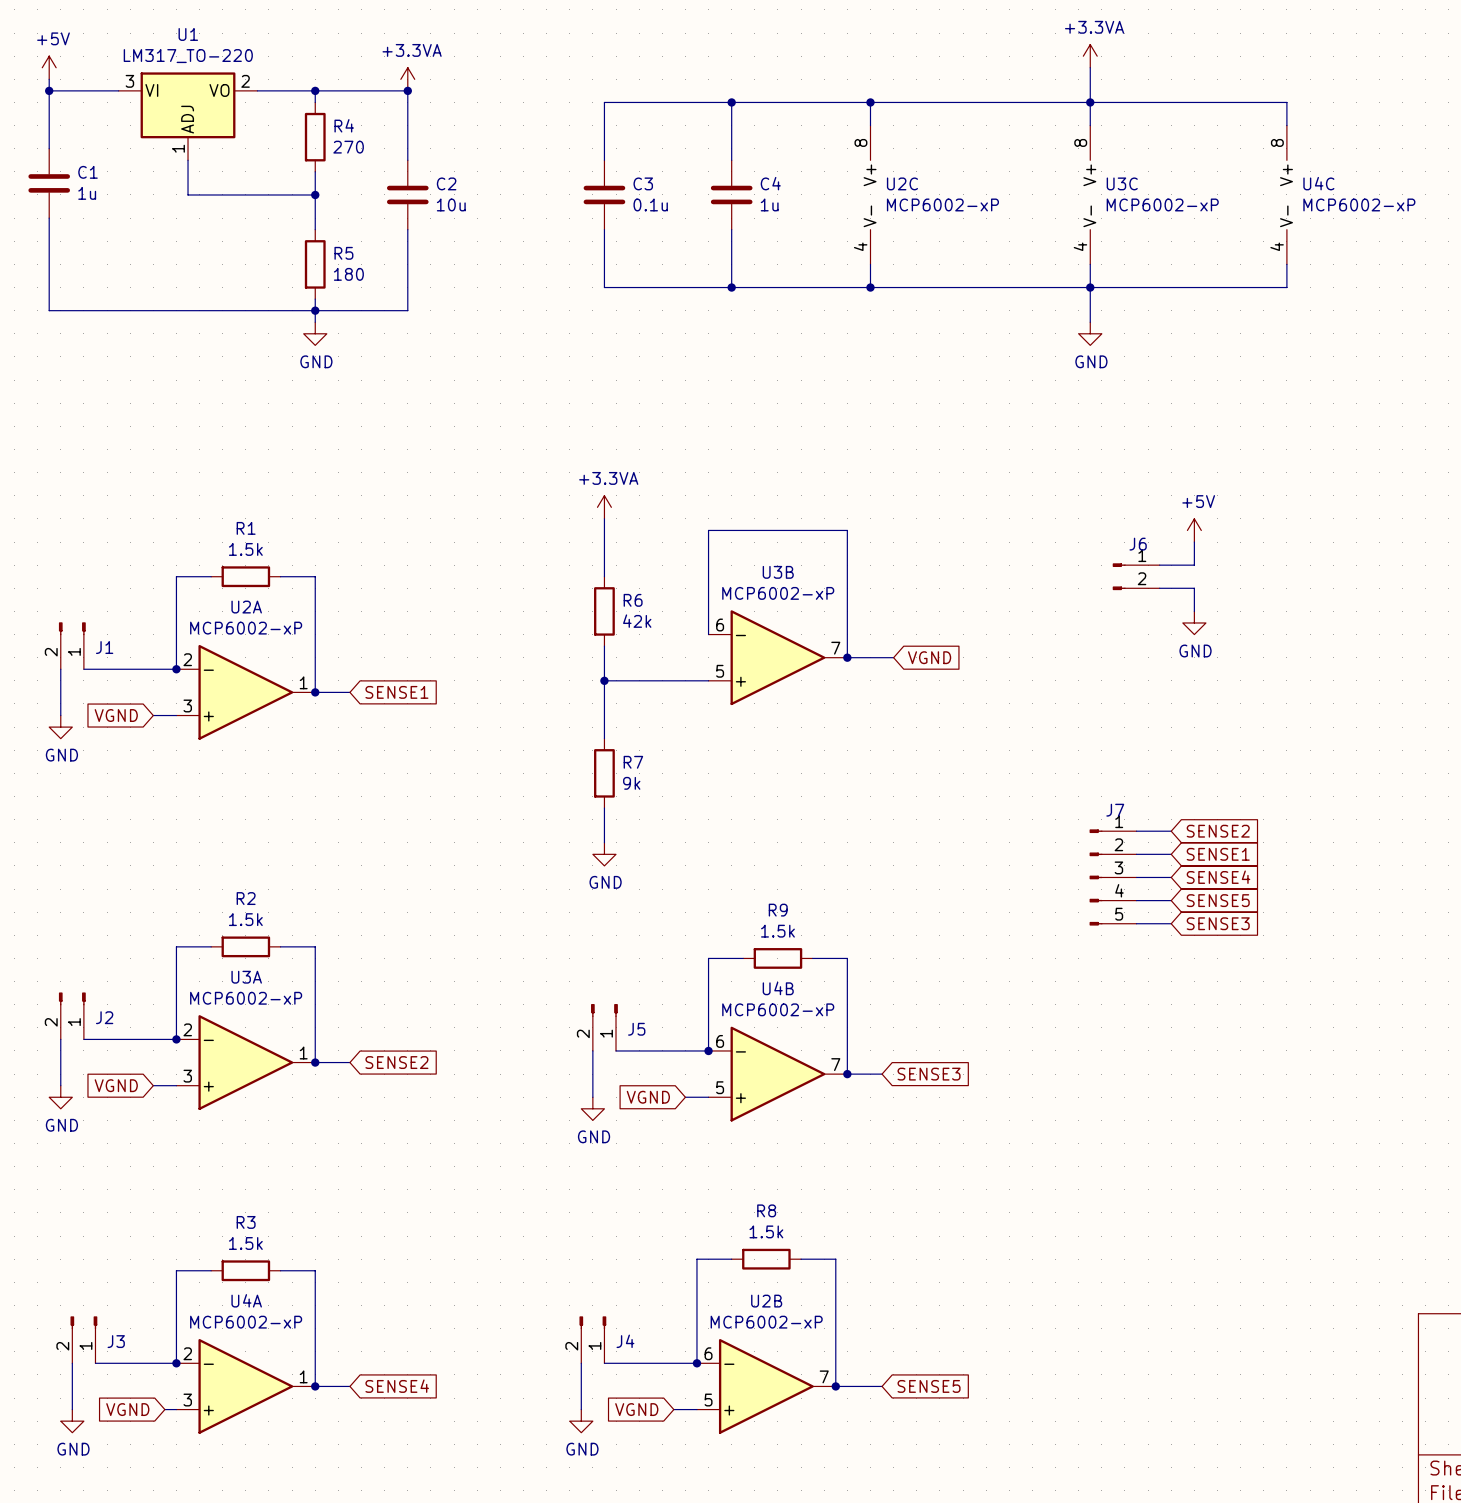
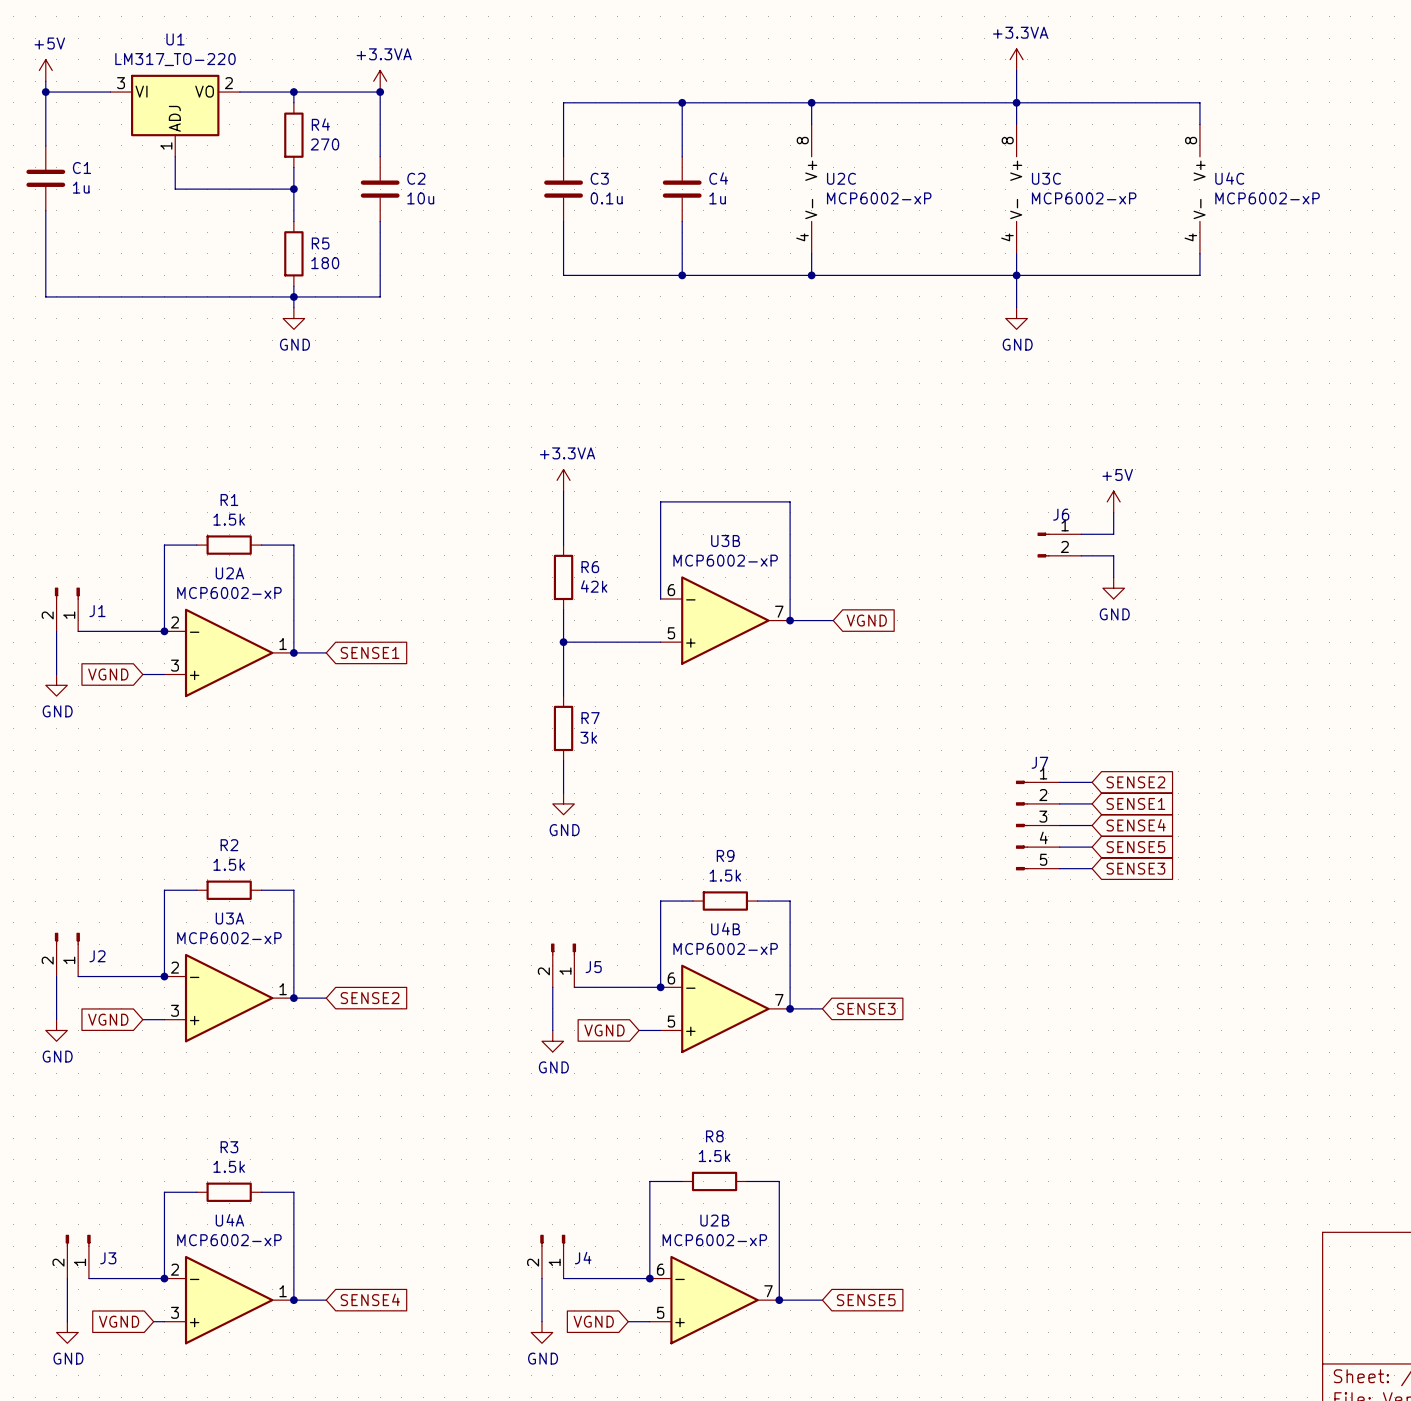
R7 value: 9k (631, 783) -> 3k (588, 737)

